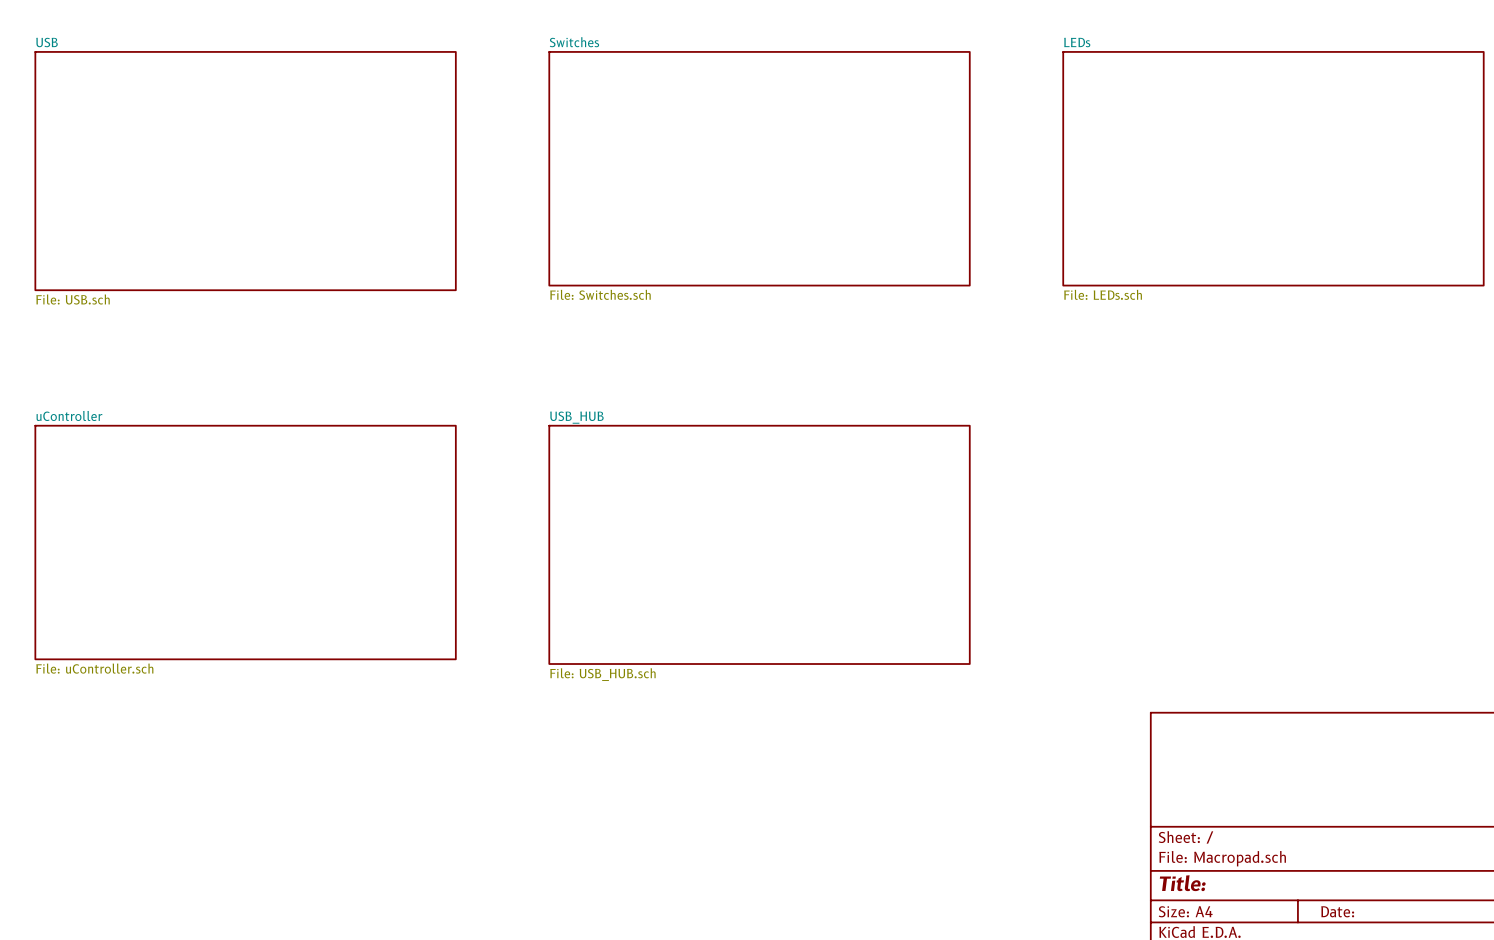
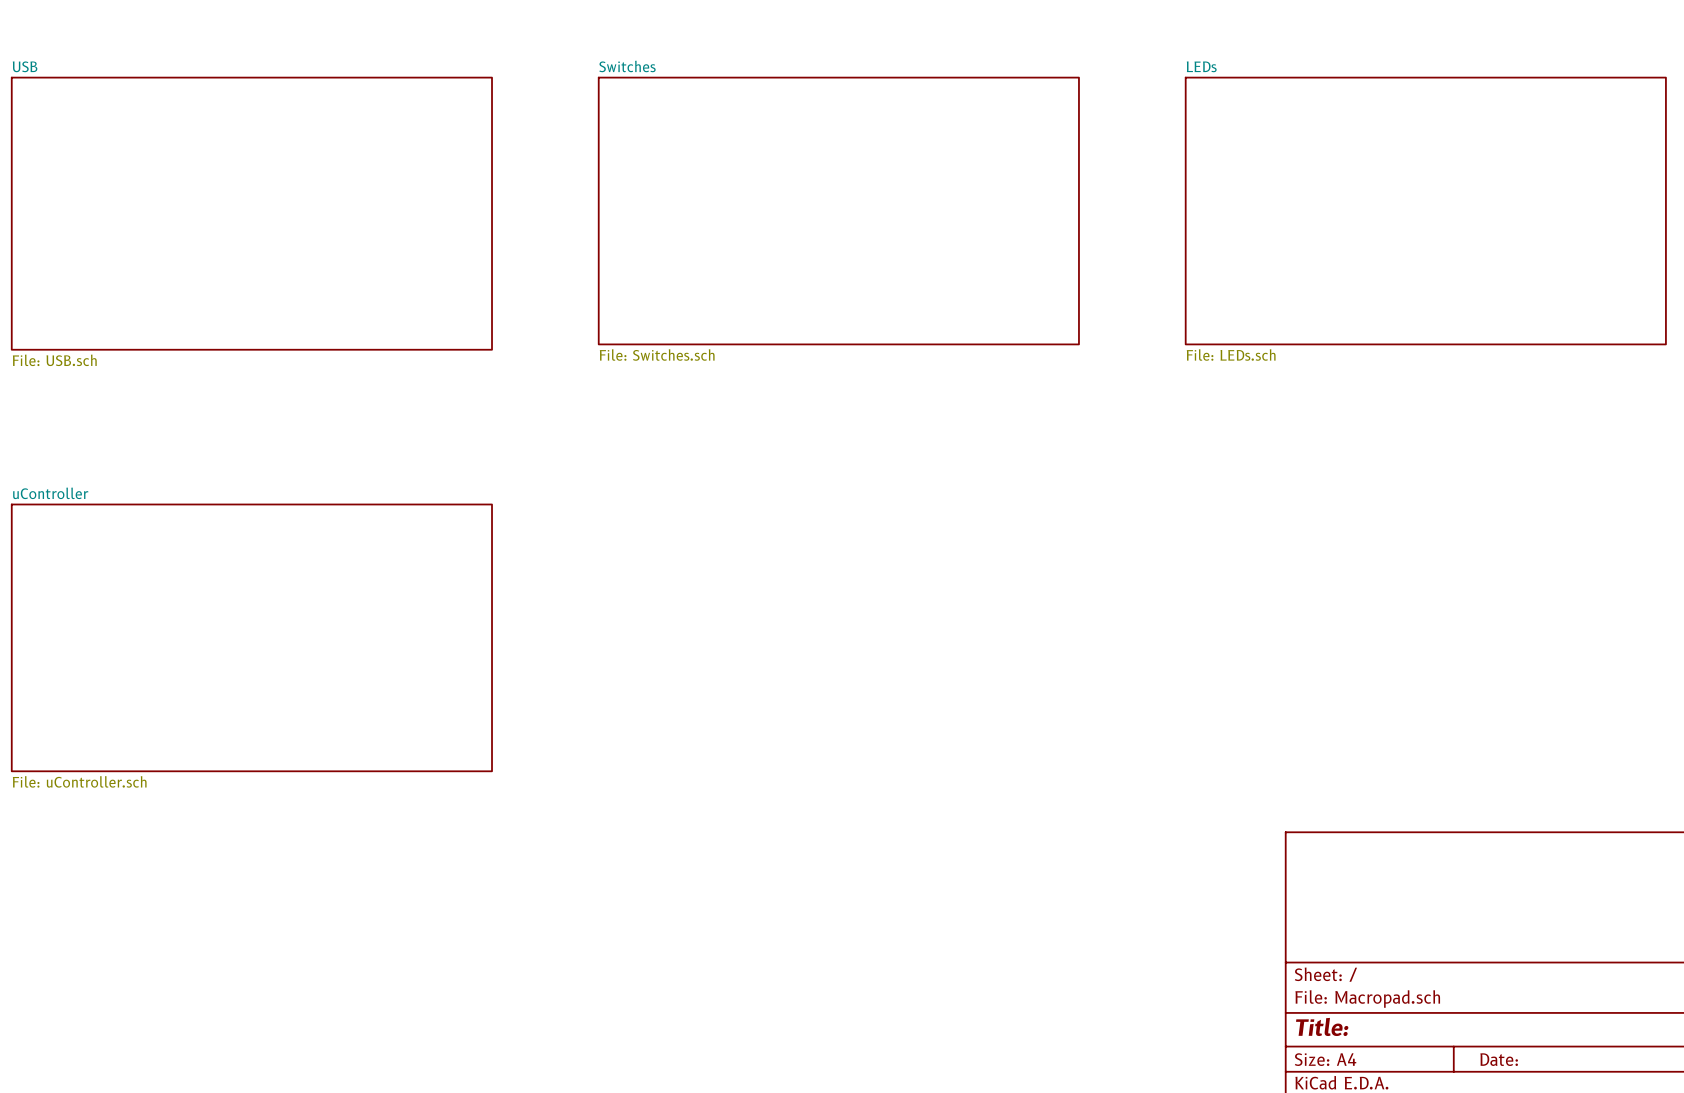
sheet USB_HUB: File: USB_HUB.sch (759, 544) -> none

